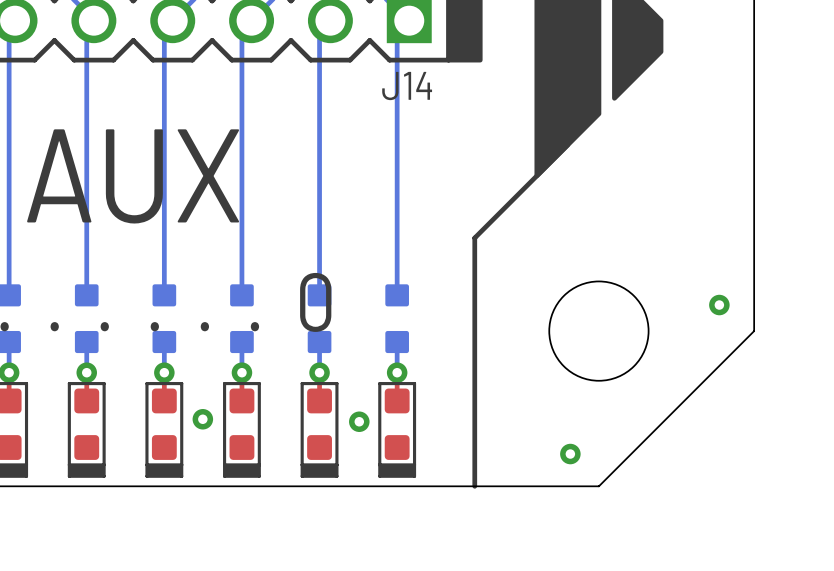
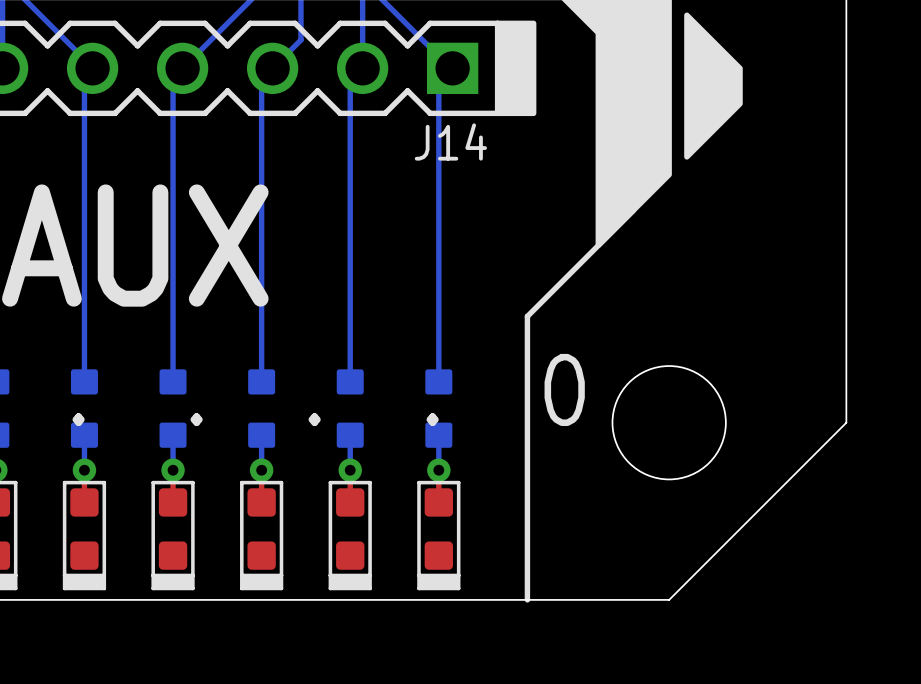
via: (719, 305) -> none
via: (202, 419) -> none
via: (359, 421) -> none
via: (570, 454) -> none

